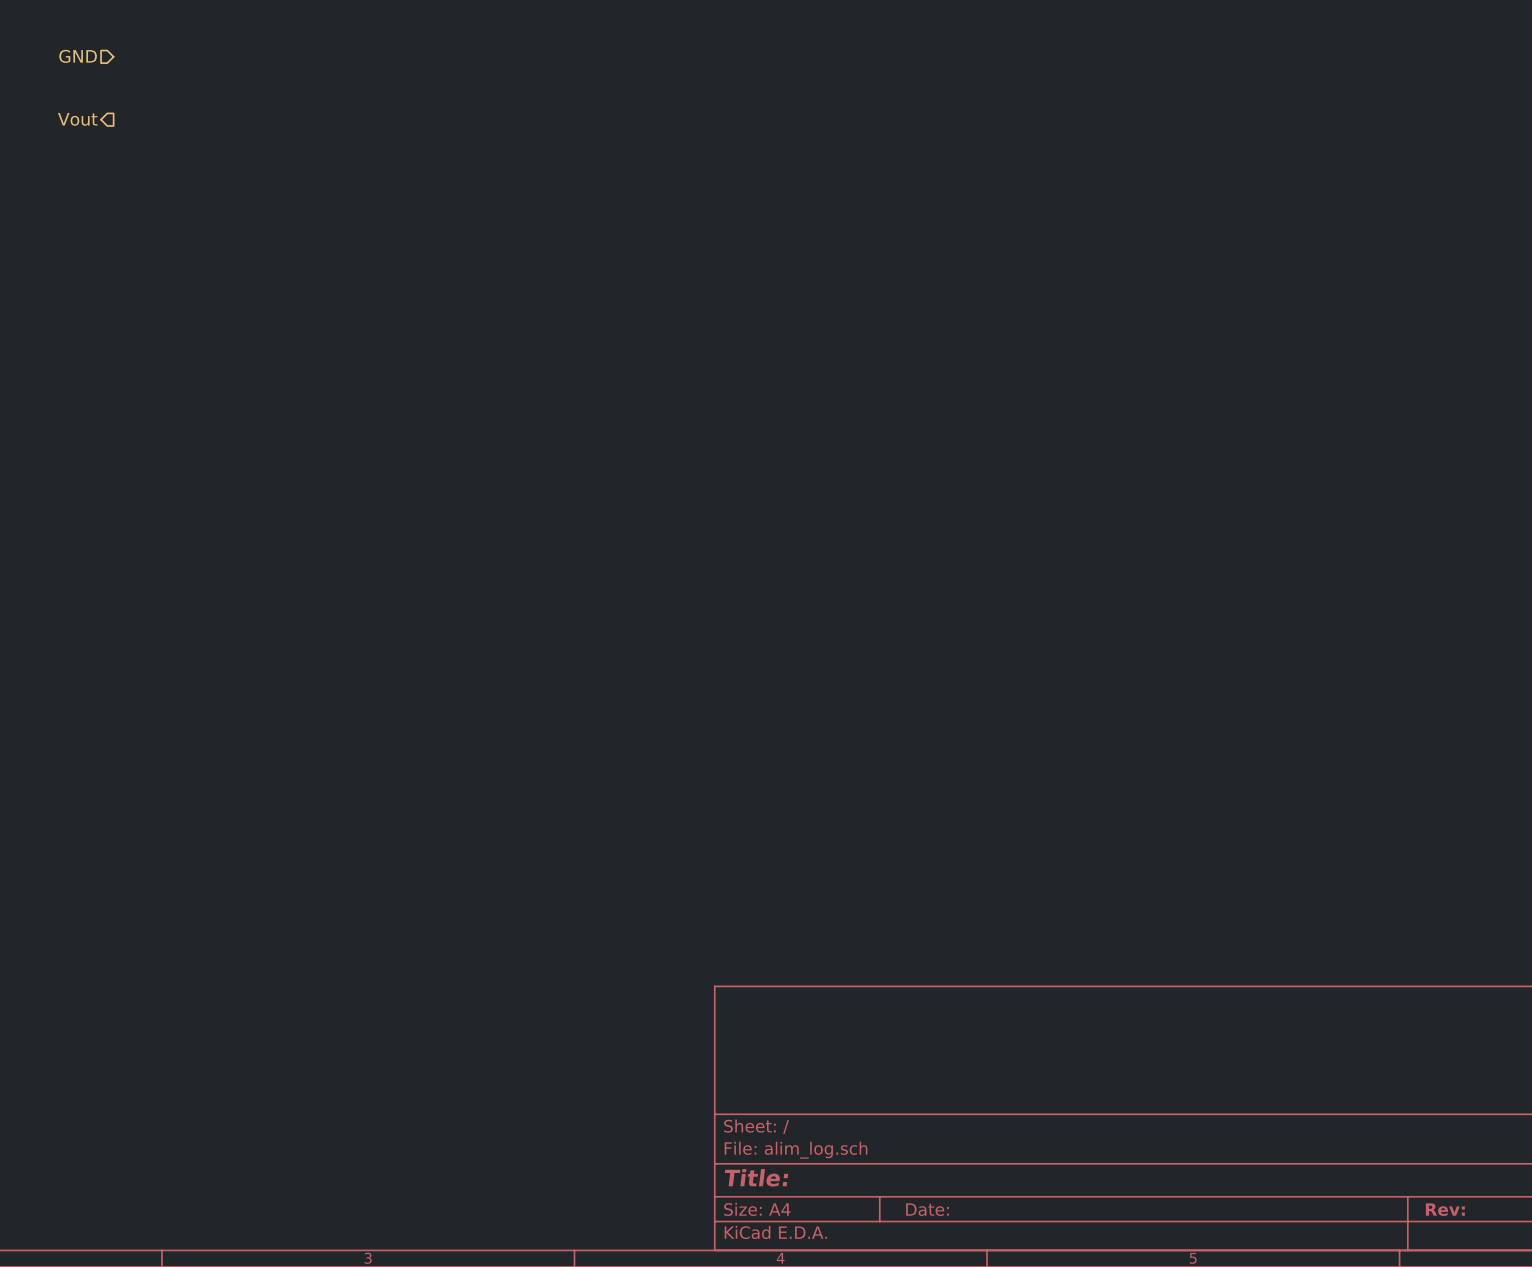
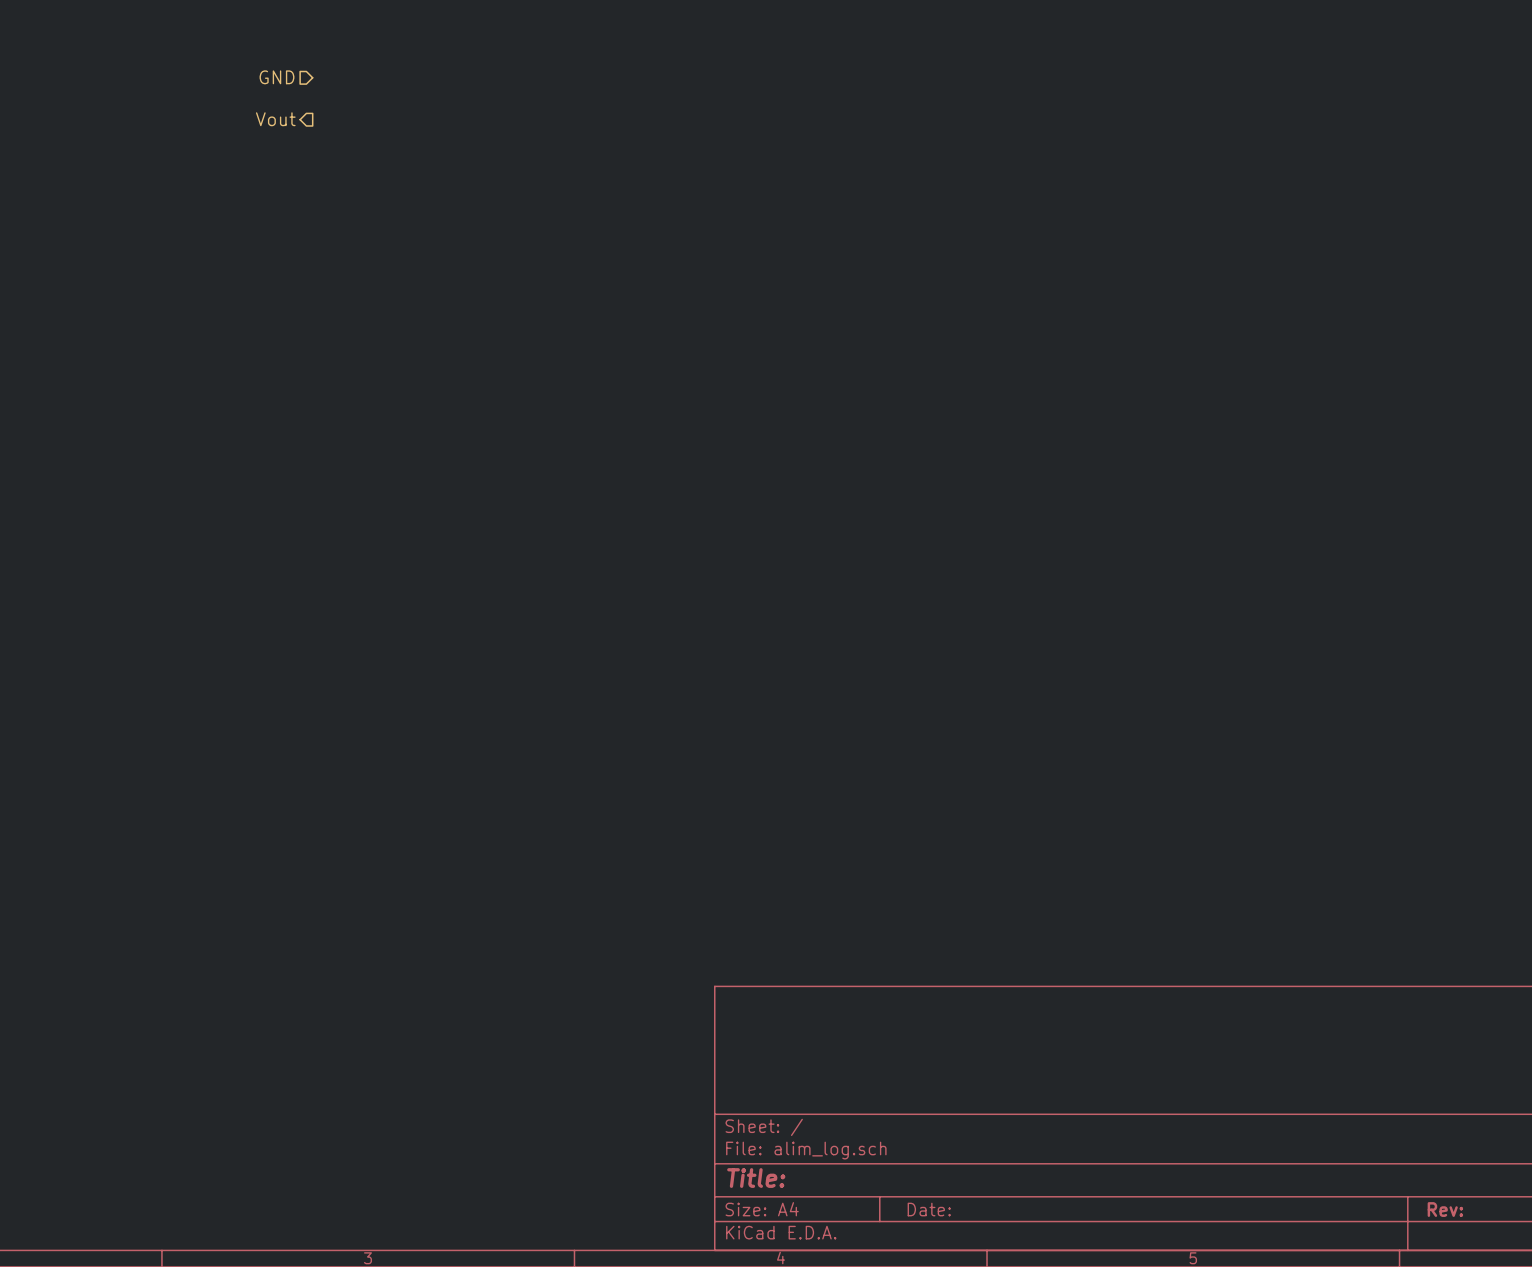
hierarchical label position: GND (78, 56) -> GND (276, 77)
hierarchical label position: Vout (77, 119) -> Vout (275, 119)

